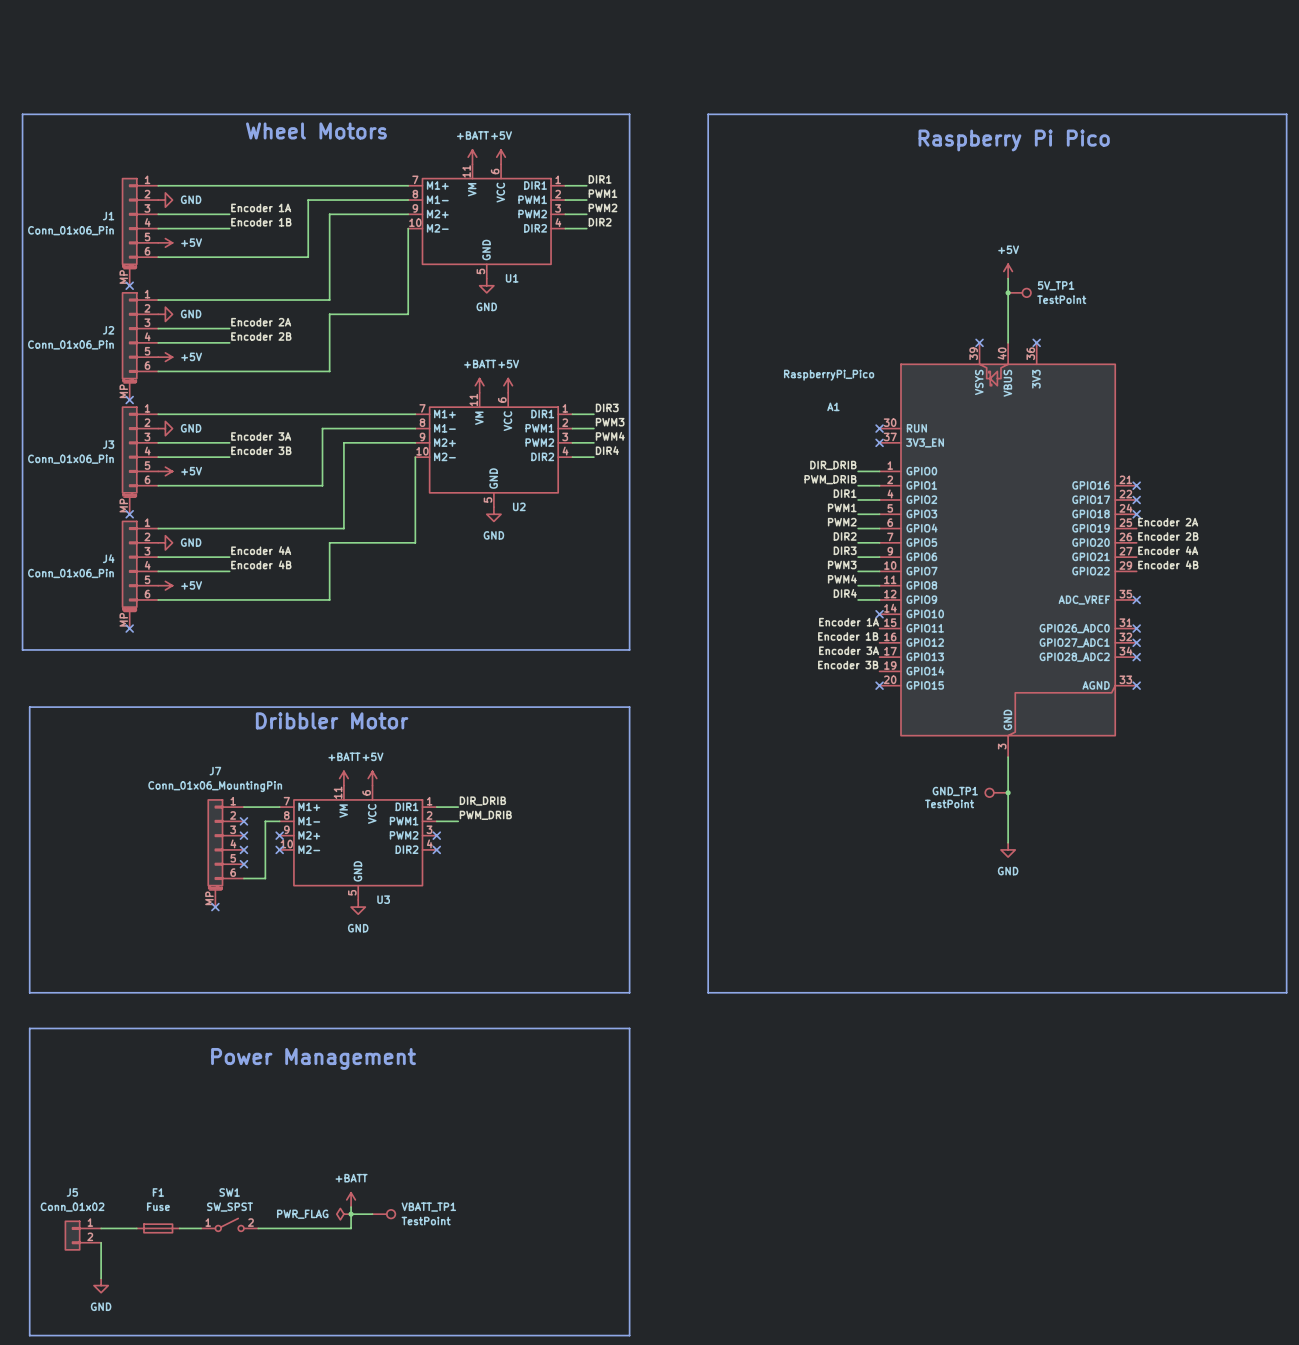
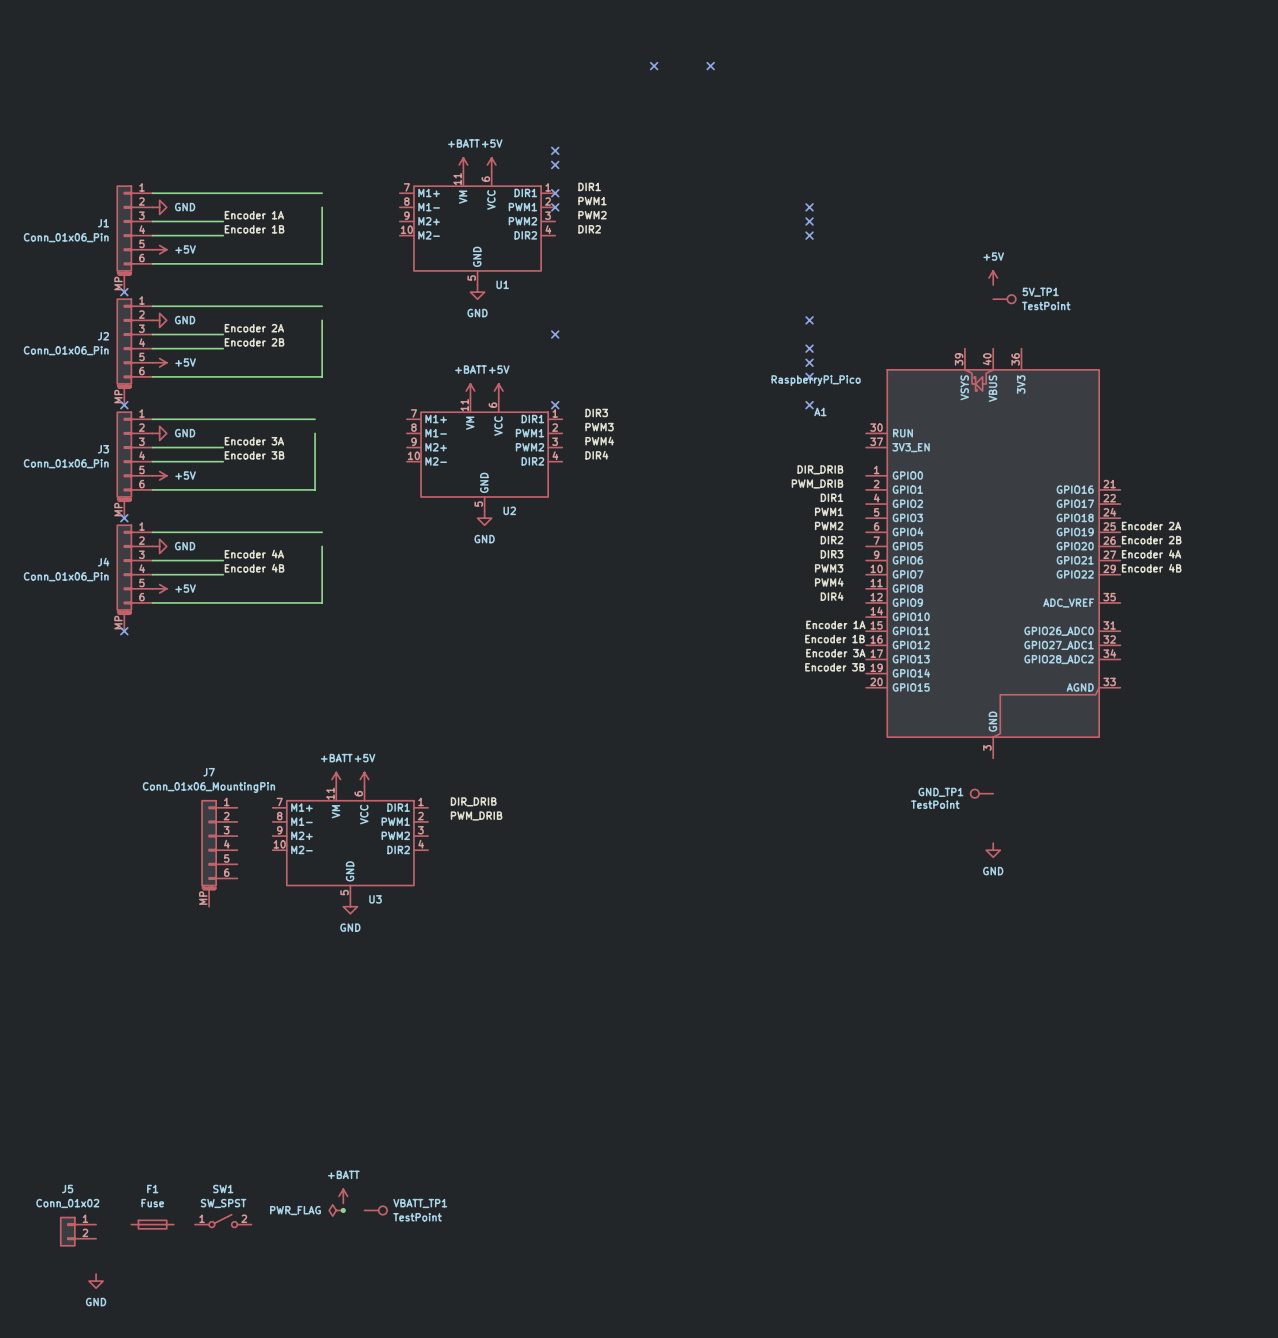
no-connect mark: none -> (654, 66)
no-connect mark: none -> (710, 66)
line: (22, 114) (629, 114) (629, 649) (22, 649) (22, 114) -> none
line: (708, 114) (1286, 114) (1286, 992) (708, 992) (708, 114) -> none
text: Wheel Motors (316, 130) -> none
text: Raspberry Pi Pico (1014, 140) -> none
no-connect mark: none -> (555, 150)
no-connect mark: none -> (555, 164)
wire: (329, 185) (408, 185) -> none
wire: (565, 185) (586, 185) -> none
no-connect mark: none -> (555, 193)
wire: (408, 200) (308, 200) (308, 257) -> none
wire: (565, 200) (586, 200) -> none
no-connect mark: none -> (555, 207)
no-connect mark: none -> (809, 207)
wire: (329, 214) (408, 214) -> (322, 221) (322, 207)
wire: (565, 214) (586, 214) -> none
no-connect mark: none -> (809, 221)
wire: (408, 228) (408, 314) (329, 314) -> none
wire: (565, 228) (586, 228) -> none
no-connect mark: none -> (809, 235)
wire: (329, 257) (329, 300) -> (322, 263) (300, 263)
wire: (1008, 278) (1008, 342) -> none
junction: (1008, 292) -> none
no-connect mark: none -> (809, 320)
no-connect mark: none -> (555, 334)
no-connect mark: none -> (809, 348)
no-connect mark: (979, 342) -> none
no-connect mark: (1036, 342) -> none
no-connect mark: none -> (809, 362)
no-connect mark: none -> (809, 376)
no-connect mark: none -> (555, 405)
no-connect mark: none -> (809, 405)
wire: (322, 414) (415, 414) -> none
wire: (572, 414) (593, 414) -> none
wire: (322, 428) (415, 428) -> none
wire: (572, 428) (593, 428) -> none
no-connect mark: (879, 428) -> none
wire: (415, 442) (343, 442) (343, 528) (329, 528) -> none
wire: (572, 442) (593, 442) -> none
no-connect mark: (879, 442) -> none
wire: (415, 457) (415, 542) (329, 542) -> none
wire: (572, 457) (593, 457) -> none
wire: (858, 471) (879, 471) -> none
wire: (858, 485) (879, 485) -> none
no-connect mark: (1136, 485) -> none
wire: (858, 499) (879, 499) -> none
no-connect mark: (1136, 499) -> none
wire: (858, 514) (879, 514) -> none
no-connect mark: (1136, 514) -> none
wire: (858, 528) (879, 528) -> none
wire: (858, 542) (879, 542) -> none
wire: (858, 557) (879, 557) -> none
wire: (858, 571) (879, 571) -> none
wire: (858, 585) (879, 585) -> none
wire: (858, 599) (879, 599) -> none
no-connect mark: (1136, 599) -> none
no-connect mark: (879, 614) -> none
no-connect mark: (1136, 628) -> none
no-connect mark: (1136, 642) -> none
no-connect mark: (1136, 657) -> none
no-connect mark: (879, 685) -> none
no-connect mark: (1136, 685) -> none
line: (29, 707) (29, 992) (629, 992) (629, 707) (29, 707) -> none
text: Dribbler Motor (332, 720) -> none
wire: (1008, 757) (1008, 842) -> none
junction: (1008, 792) -> none
wire: (243, 807) (279, 807) -> none
wire: (436, 807) (458, 807) -> none
no-connect mark: (243, 821) -> none
wire: (279, 821) (265, 821) (265, 878) (243, 878) -> none
wire: (436, 821) (458, 821) -> none
no-connect mark: (243, 835) -> none
no-connect mark: (279, 835) -> none
no-connect mark: (436, 835) -> none
no-connect mark: (243, 849) -> none
no-connect mark: (279, 849) -> none
no-connect mark: (436, 849) -> none
no-connect mark: (243, 864) -> none
no-connect mark: (215, 907) -> none
line: (29, 1028) (629, 1028) (629, 1335) (29, 1335) (29, 1028) -> none
text: Power Management (313, 1058) -> none
wire: (351, 1207) (351, 1228) (258, 1228) -> none
wire: (351, 1214) (372, 1214) -> none
wire: (101, 1228) (136, 1228) -> none
wire: (179, 1228) (201, 1228) -> none
wire: (101, 1242) (101, 1278) -> none

